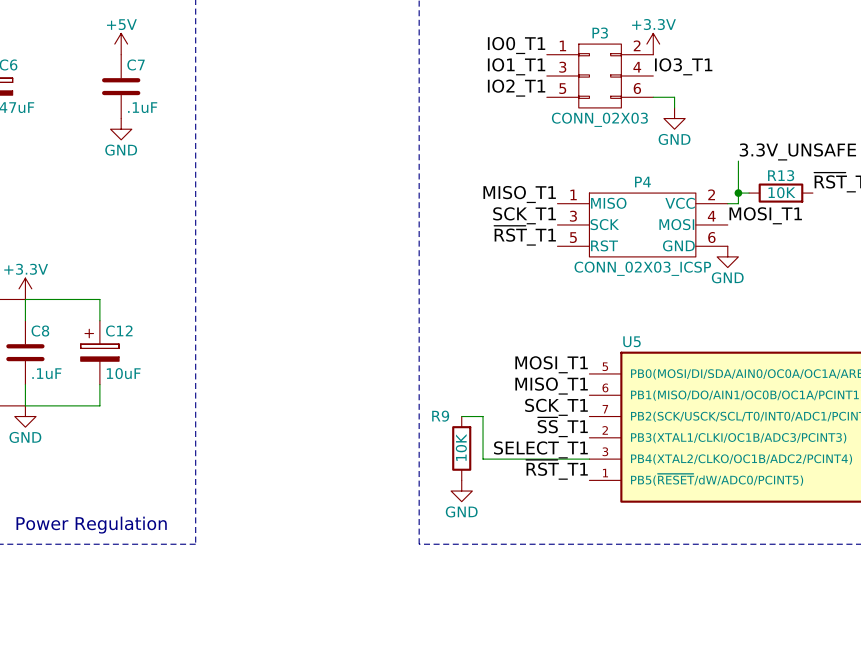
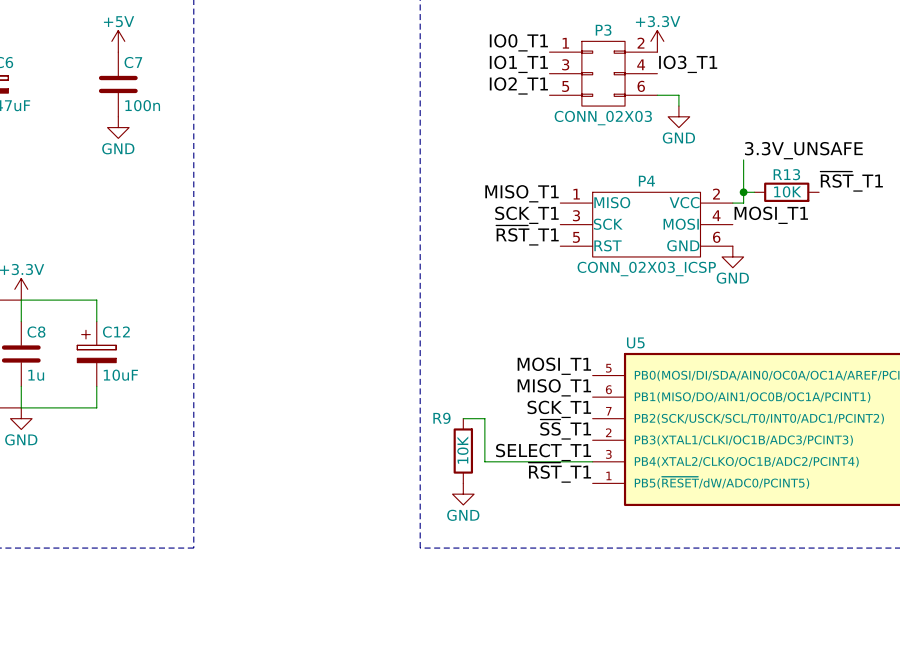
C7 value: .1uF (142, 107) -> 100n (142, 105)
C8 value: .1uF (46, 373) -> 1u (36, 375)
text: Power Regulation (91, 525) -> none

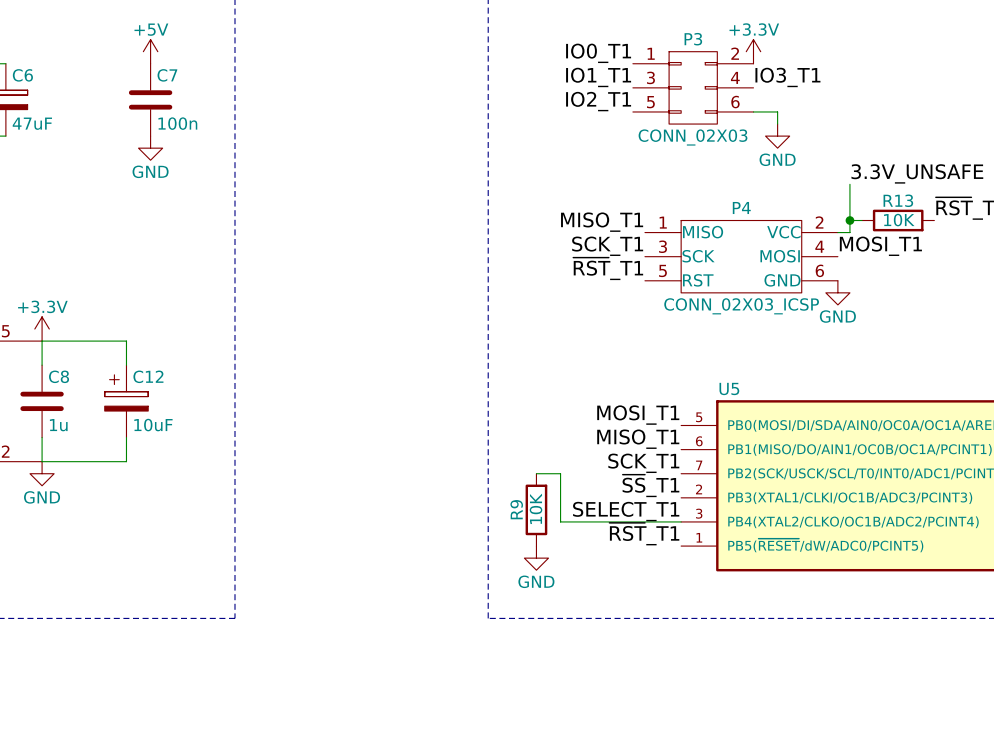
R9 name rotation: 0° (441, 418) -> 90° counterclockwise (516, 509)
R9 name position: R9 (441, 418) -> R9 (516, 509)

